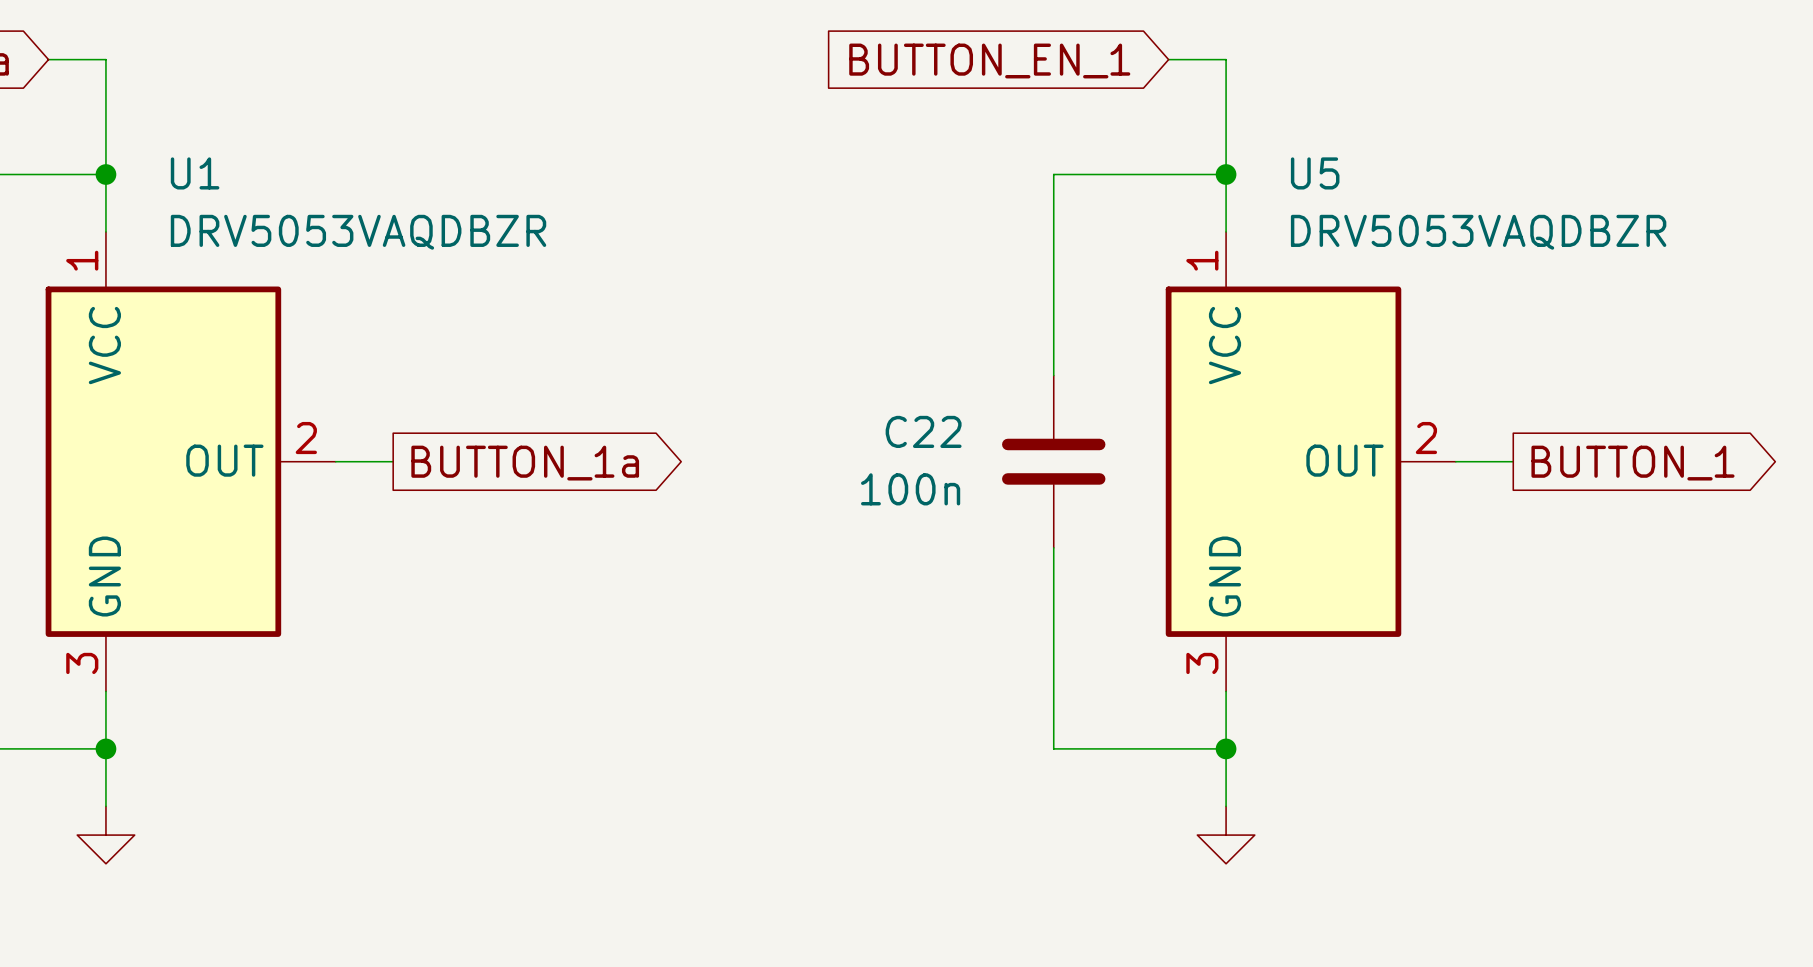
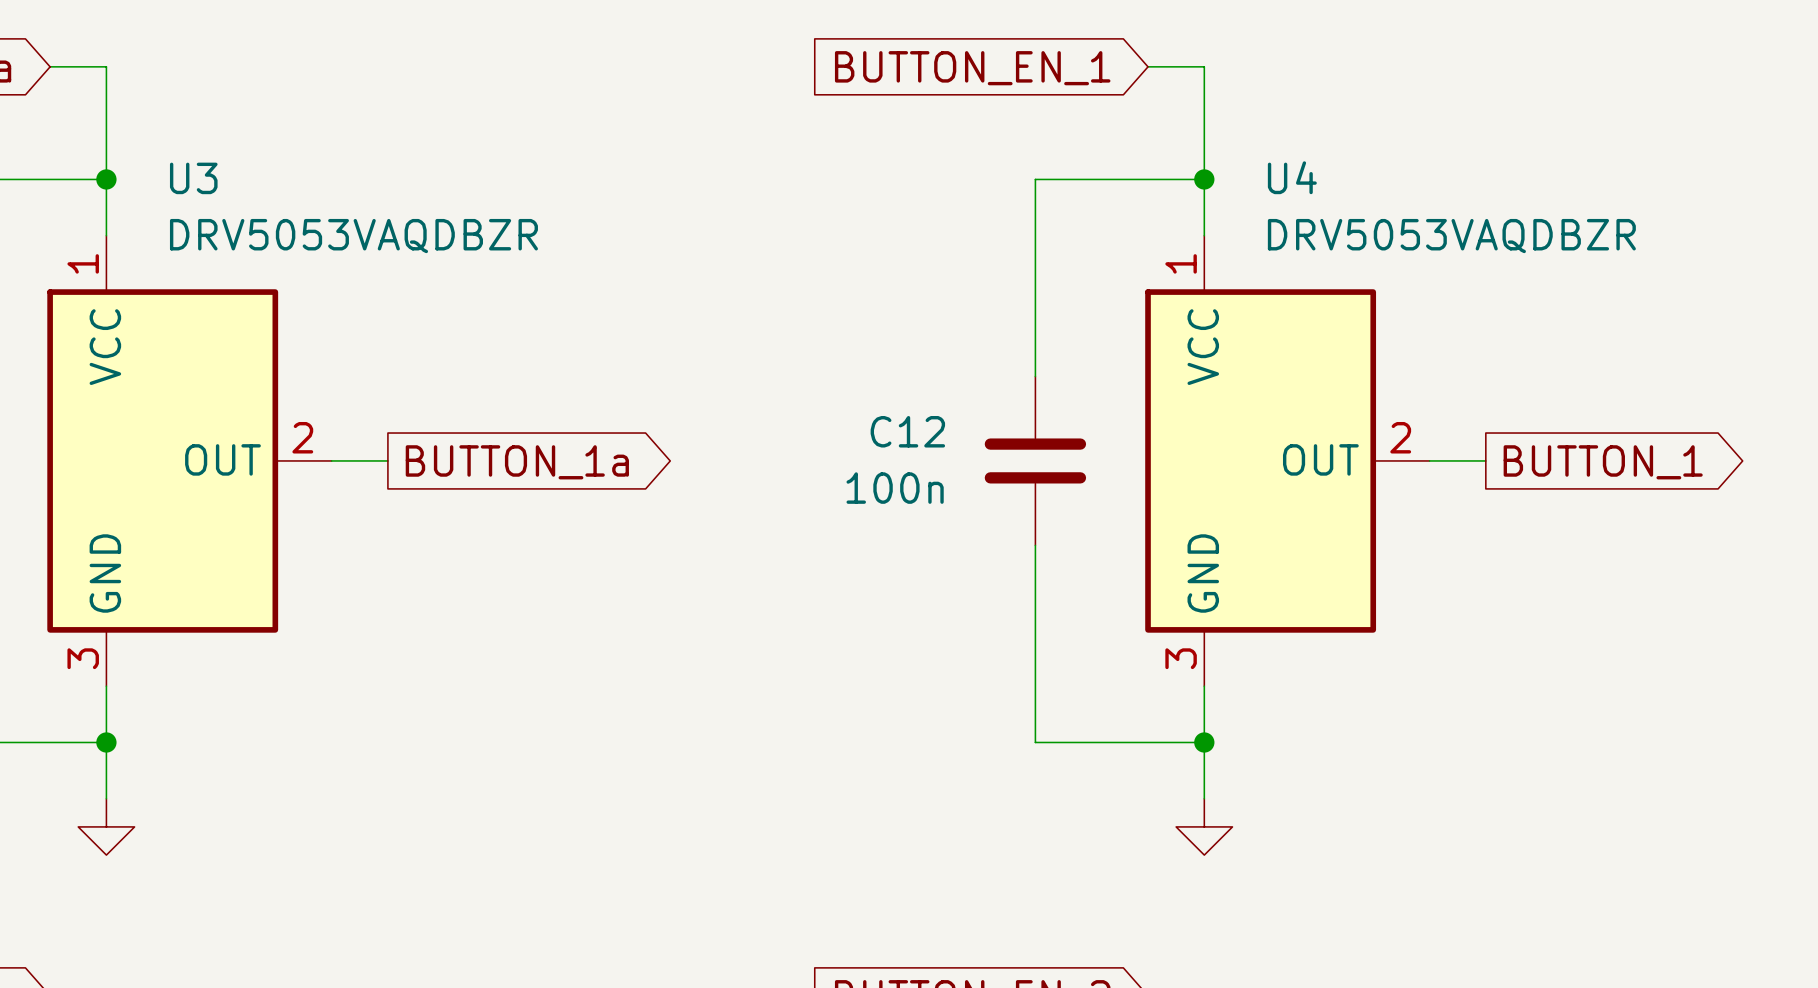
U1 name: U1 (195, 173) -> U3 (193, 178)
U5 name: U5 (1315, 173) -> U4 (1292, 177)
C22 name: C22 (923, 431) -> C12 (907, 431)

